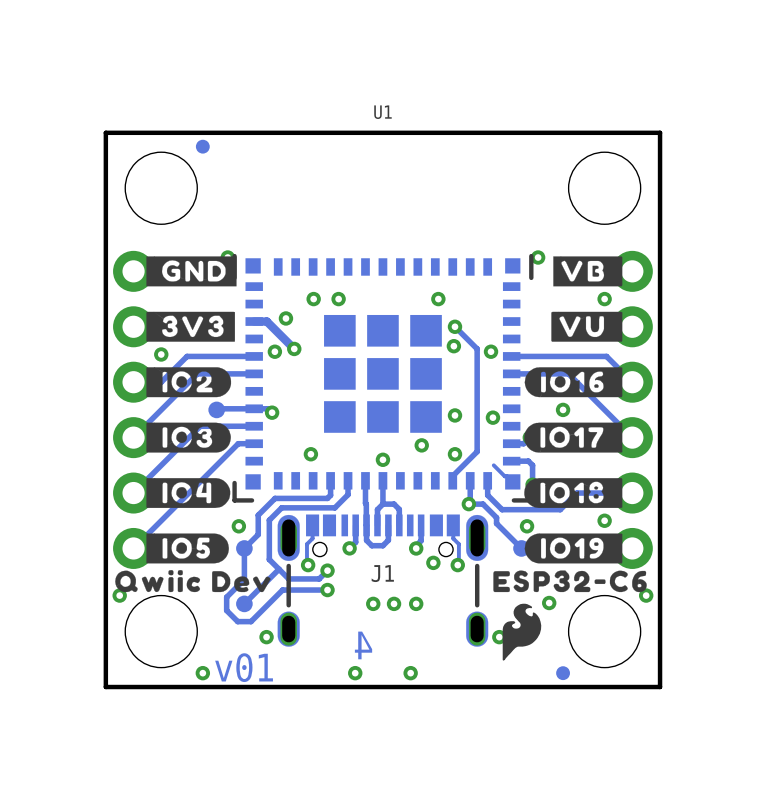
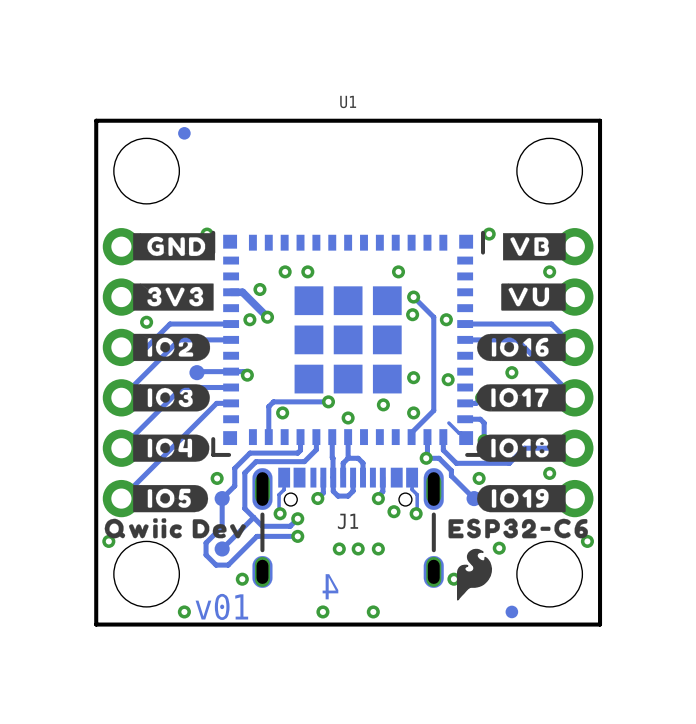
track: none -> (328, 401) (273, 401) (268, 406) (268, 437)
via: none -> (328, 401)

